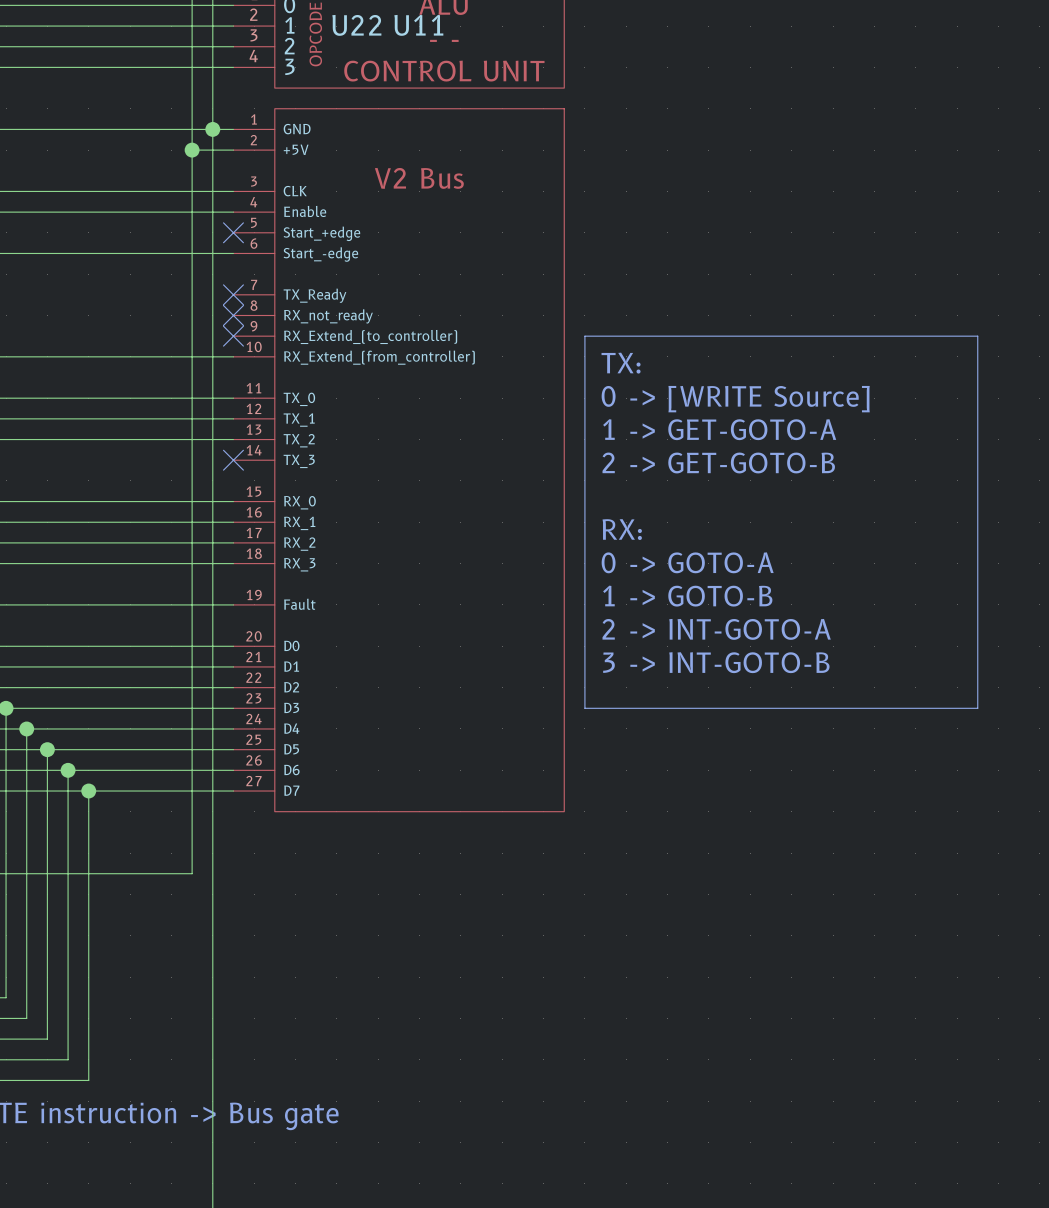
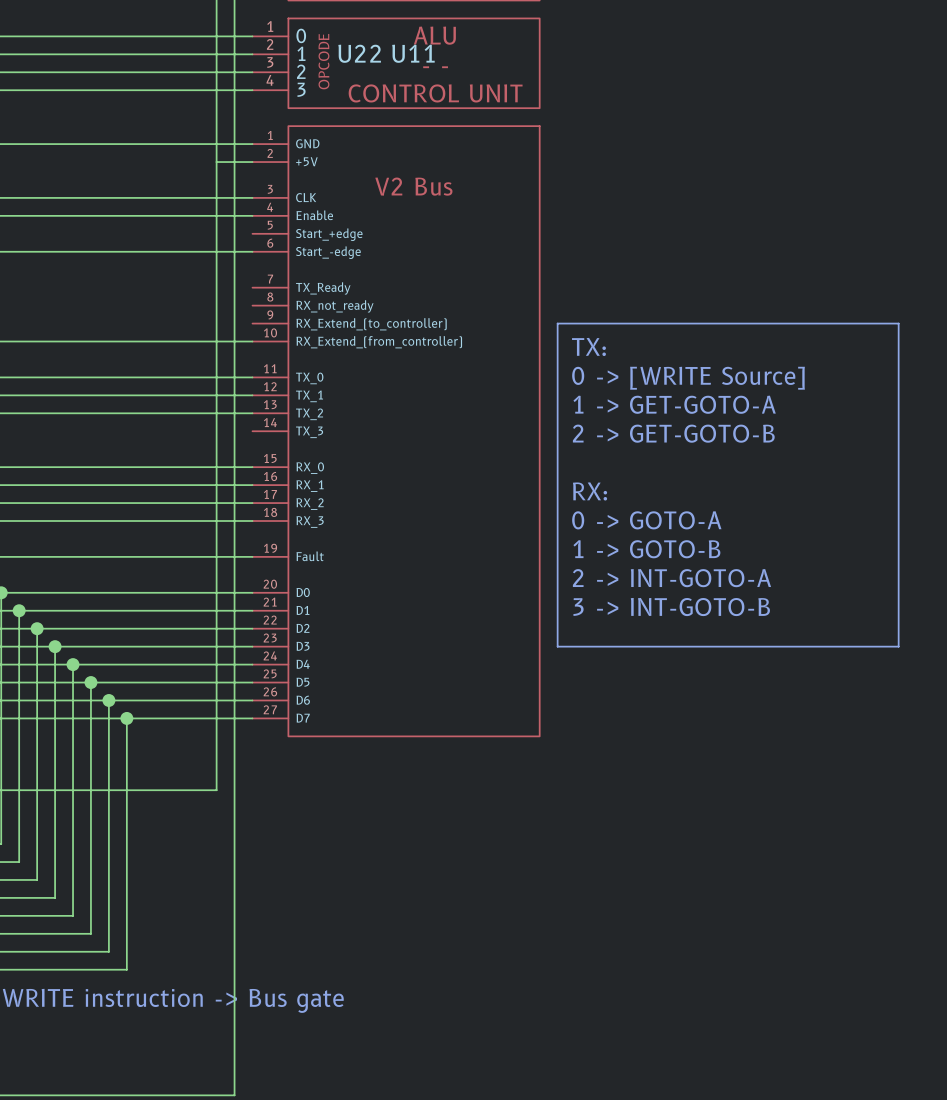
junction: (212, 129) -> none
junction: (192, 150) -> none
no-connect mark: (233, 232) -> none
no-connect mark: (233, 294) -> none
no-connect mark: (233, 315) -> none
no-connect mark: (233, 336) -> none
no-connect mark: (233, 460) -> none

